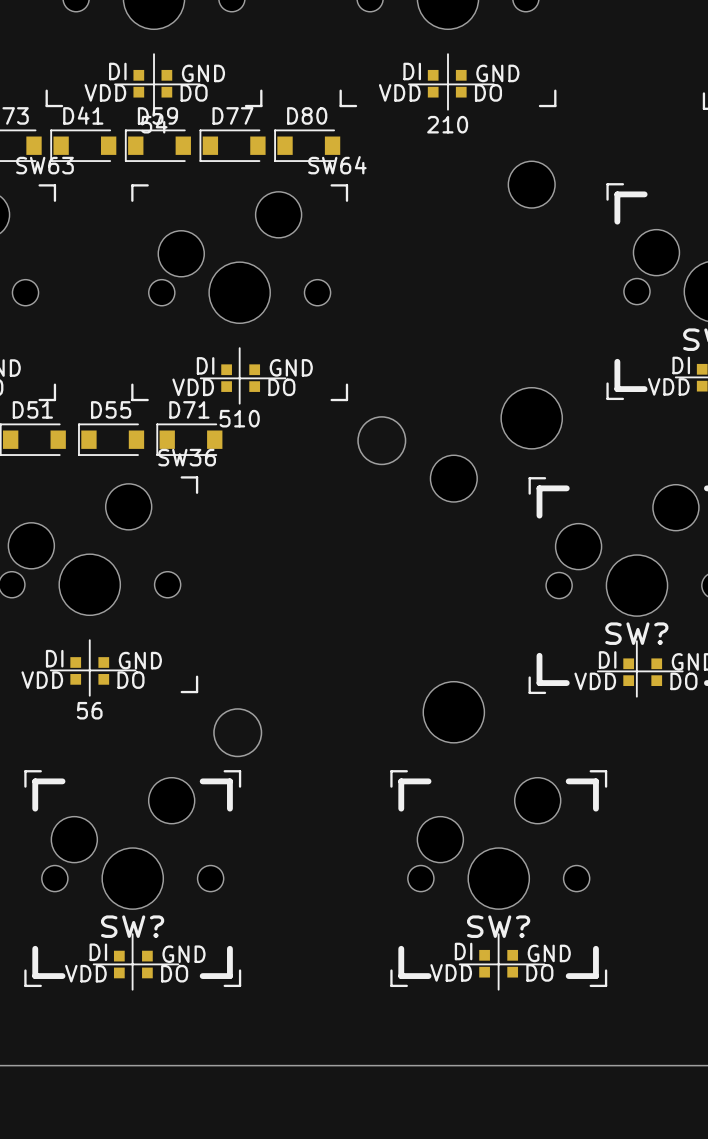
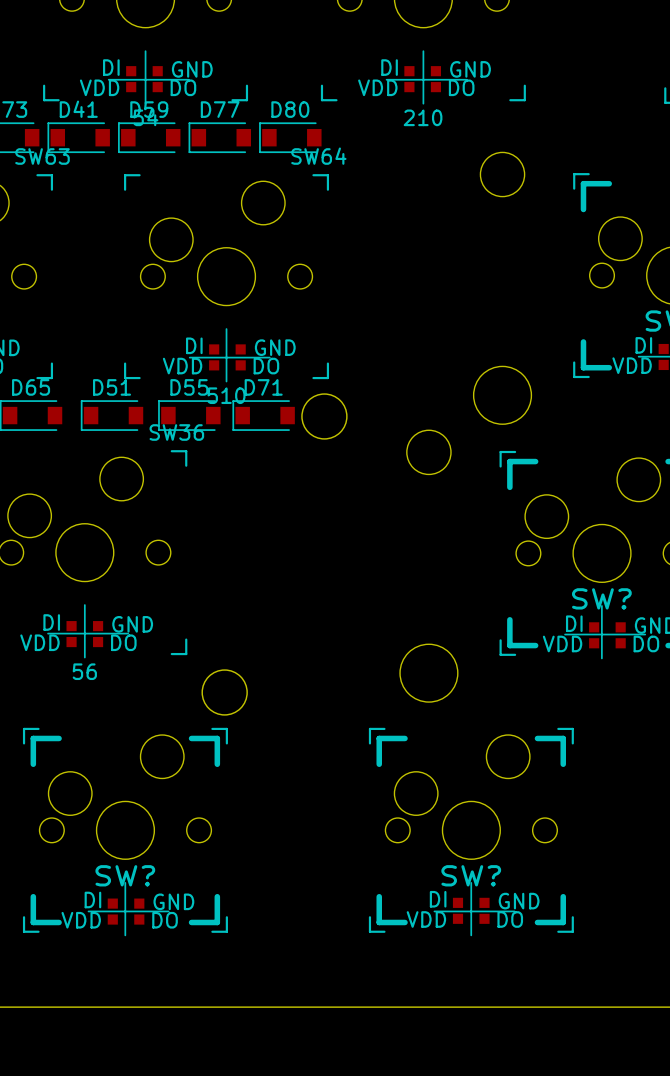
D51 name: D51 (32, 409) -> D65 (31, 387)
D55 position: (111, 439) -> (189, 415)
D51: none -> (112, 415)
D71 position: (189, 439) -> (263, 415)
round board edge position: (381, 440) -> (324, 416)

